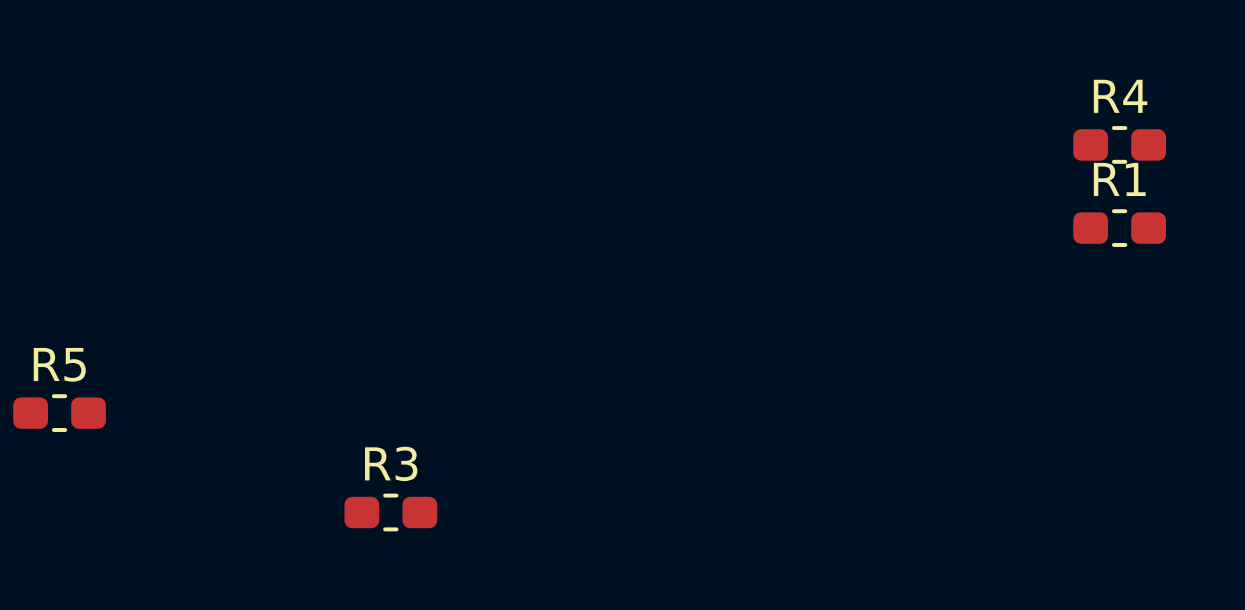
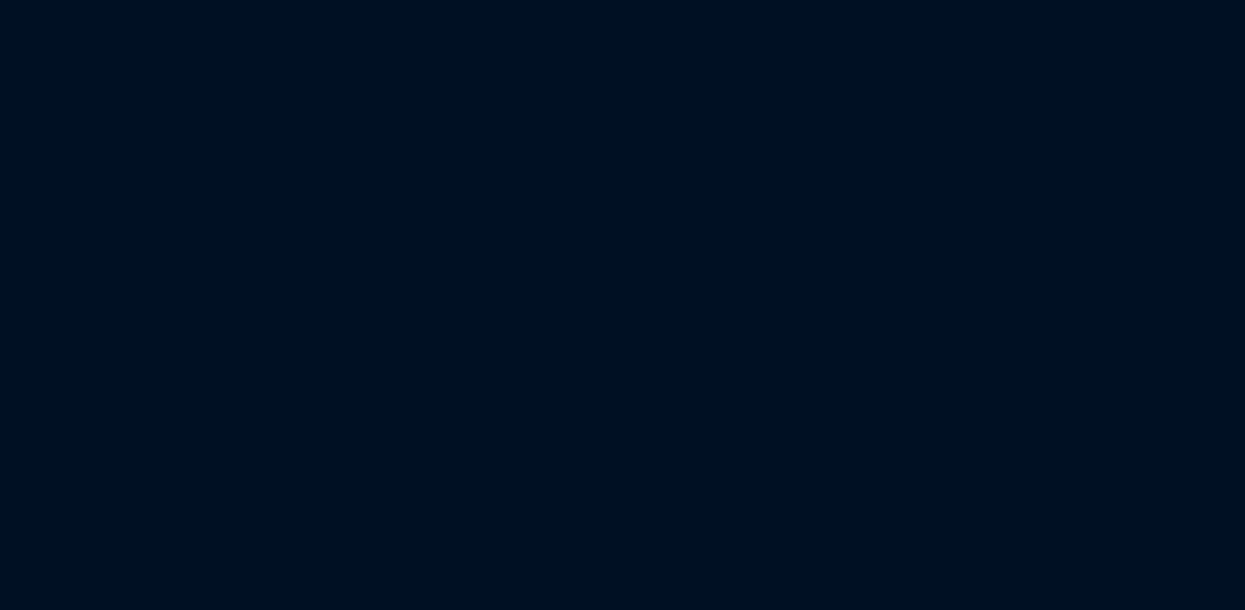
R4: (1119, 144) -> none
R1: (1119, 228) -> none
R5: (59, 413) -> none
R3: (390, 512) -> none

